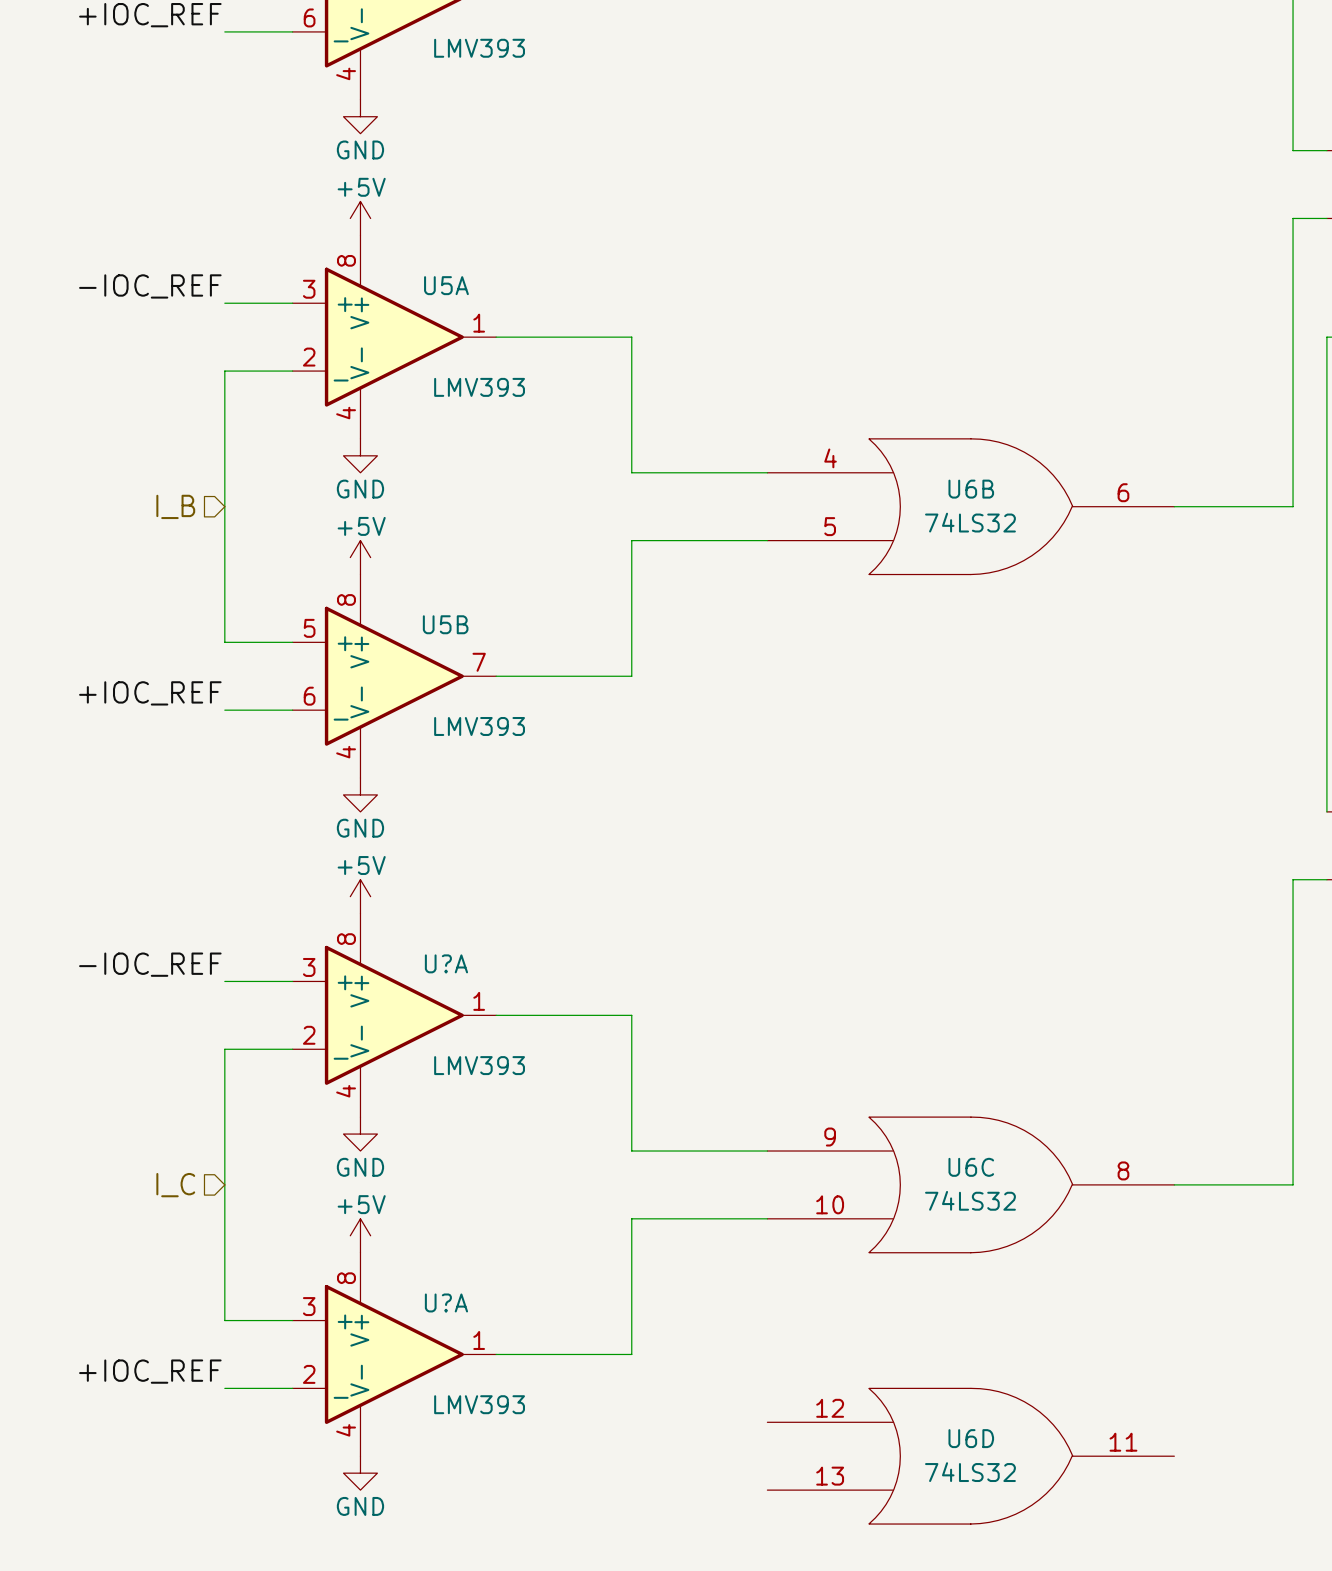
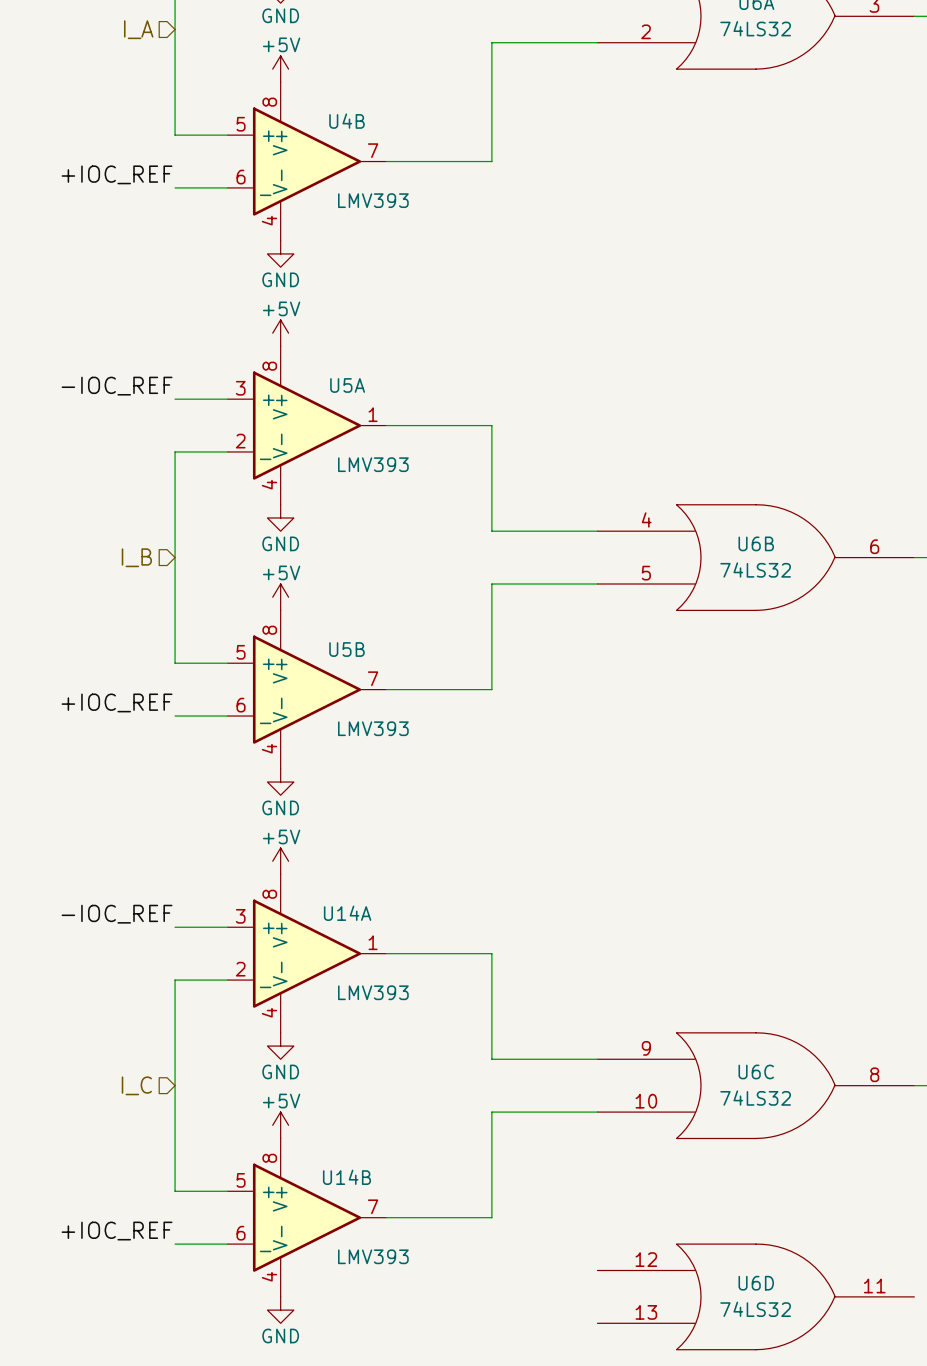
U?A name: U?A (446, 963) -> U14A (347, 913)
U?A name: U?A (446, 1302) -> U14B (346, 1177)
U?A pin number: 3 (309, 1306) -> 5 (241, 1180)
U?A pin number: 1 (479, 1340) -> 7 (373, 1206)
U?A pin number: 2 (309, 1374) -> 6 (241, 1233)

